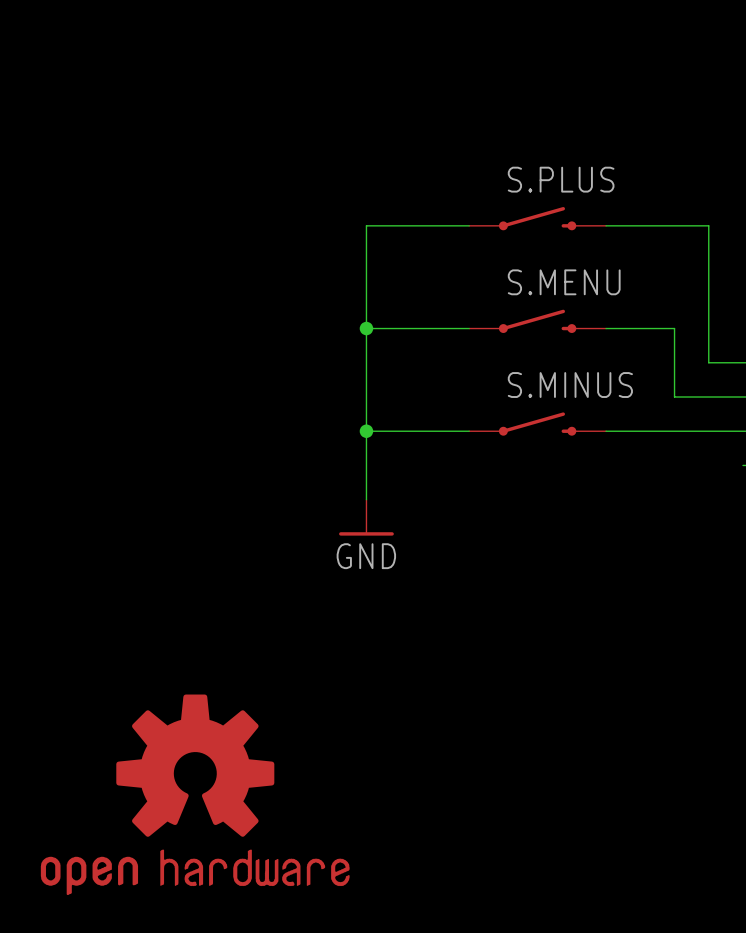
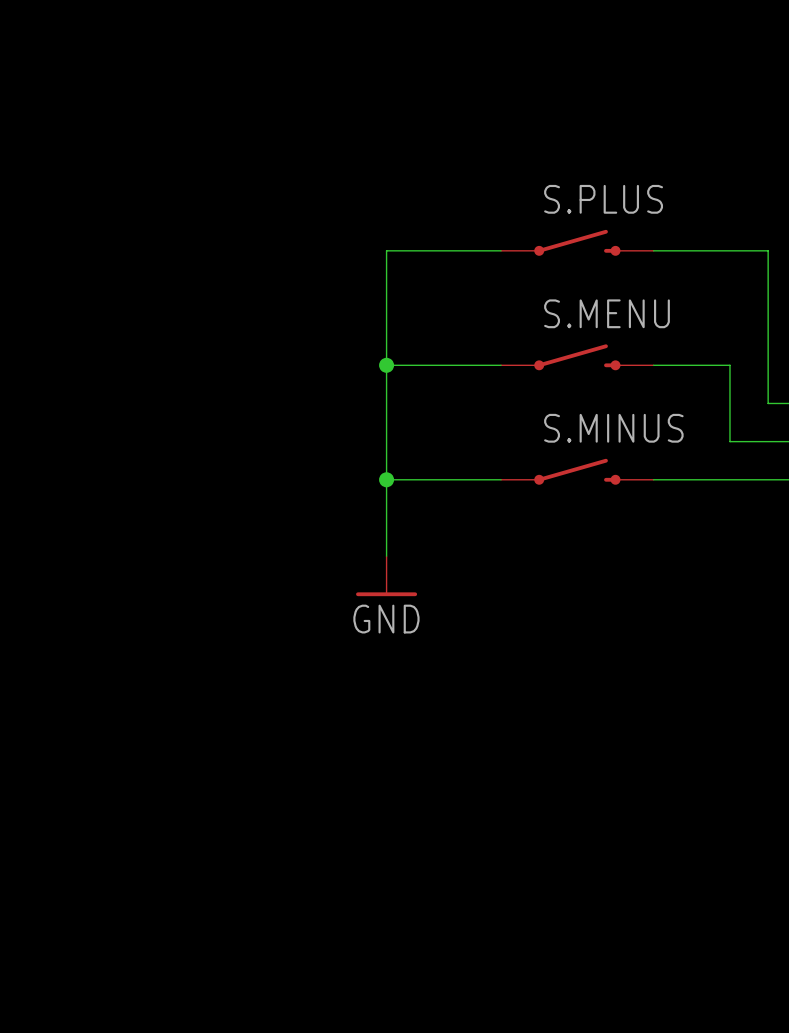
part: (195, 794) -> none

